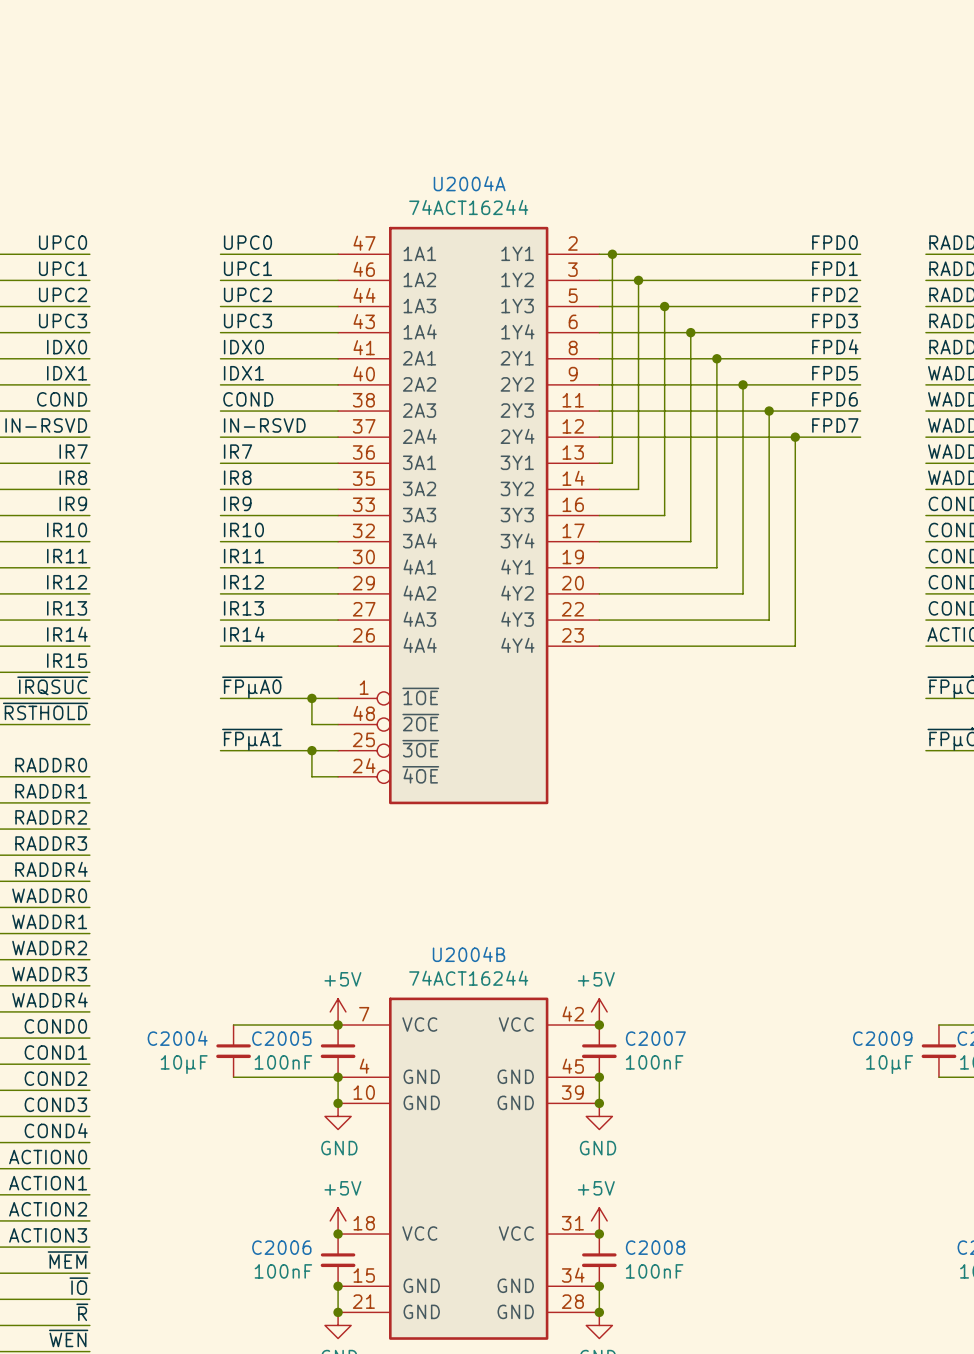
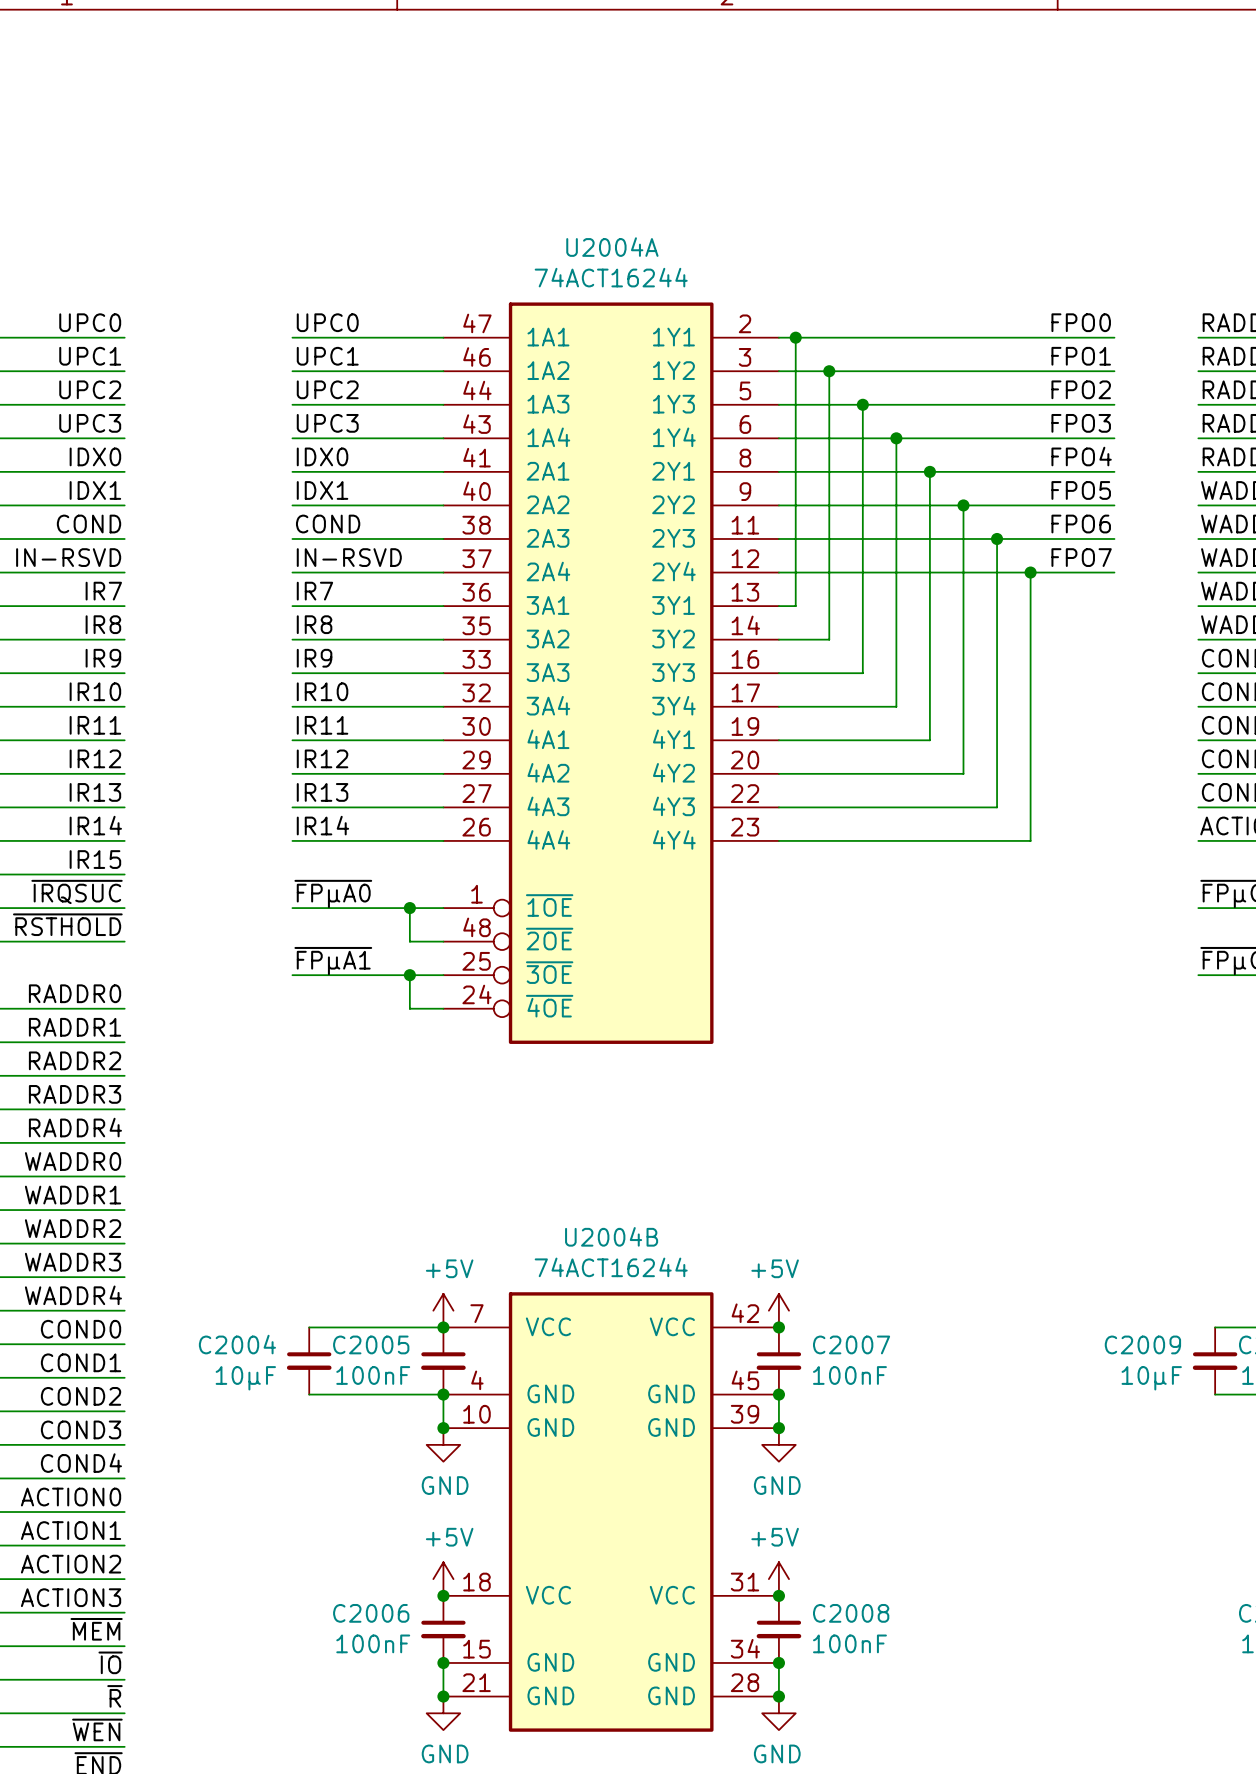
label: FPD0 (834, 242) -> FPO0 (1081, 322)
label: FPD1 (834, 268) -> FPO1 (1081, 356)
label: FPD2 (834, 294) -> FPO2 (1081, 389)
label: FPD3 (834, 320) -> FPO3 (1081, 423)
label: FPD4 (835, 346) -> FPO4 (1081, 456)
label: FPD5 (834, 373) -> FPO5 (1081, 490)
label: FPD6 (834, 399) -> FPO6 (1081, 524)
label: FPD7 (835, 425) -> FPO7 (1081, 557)

